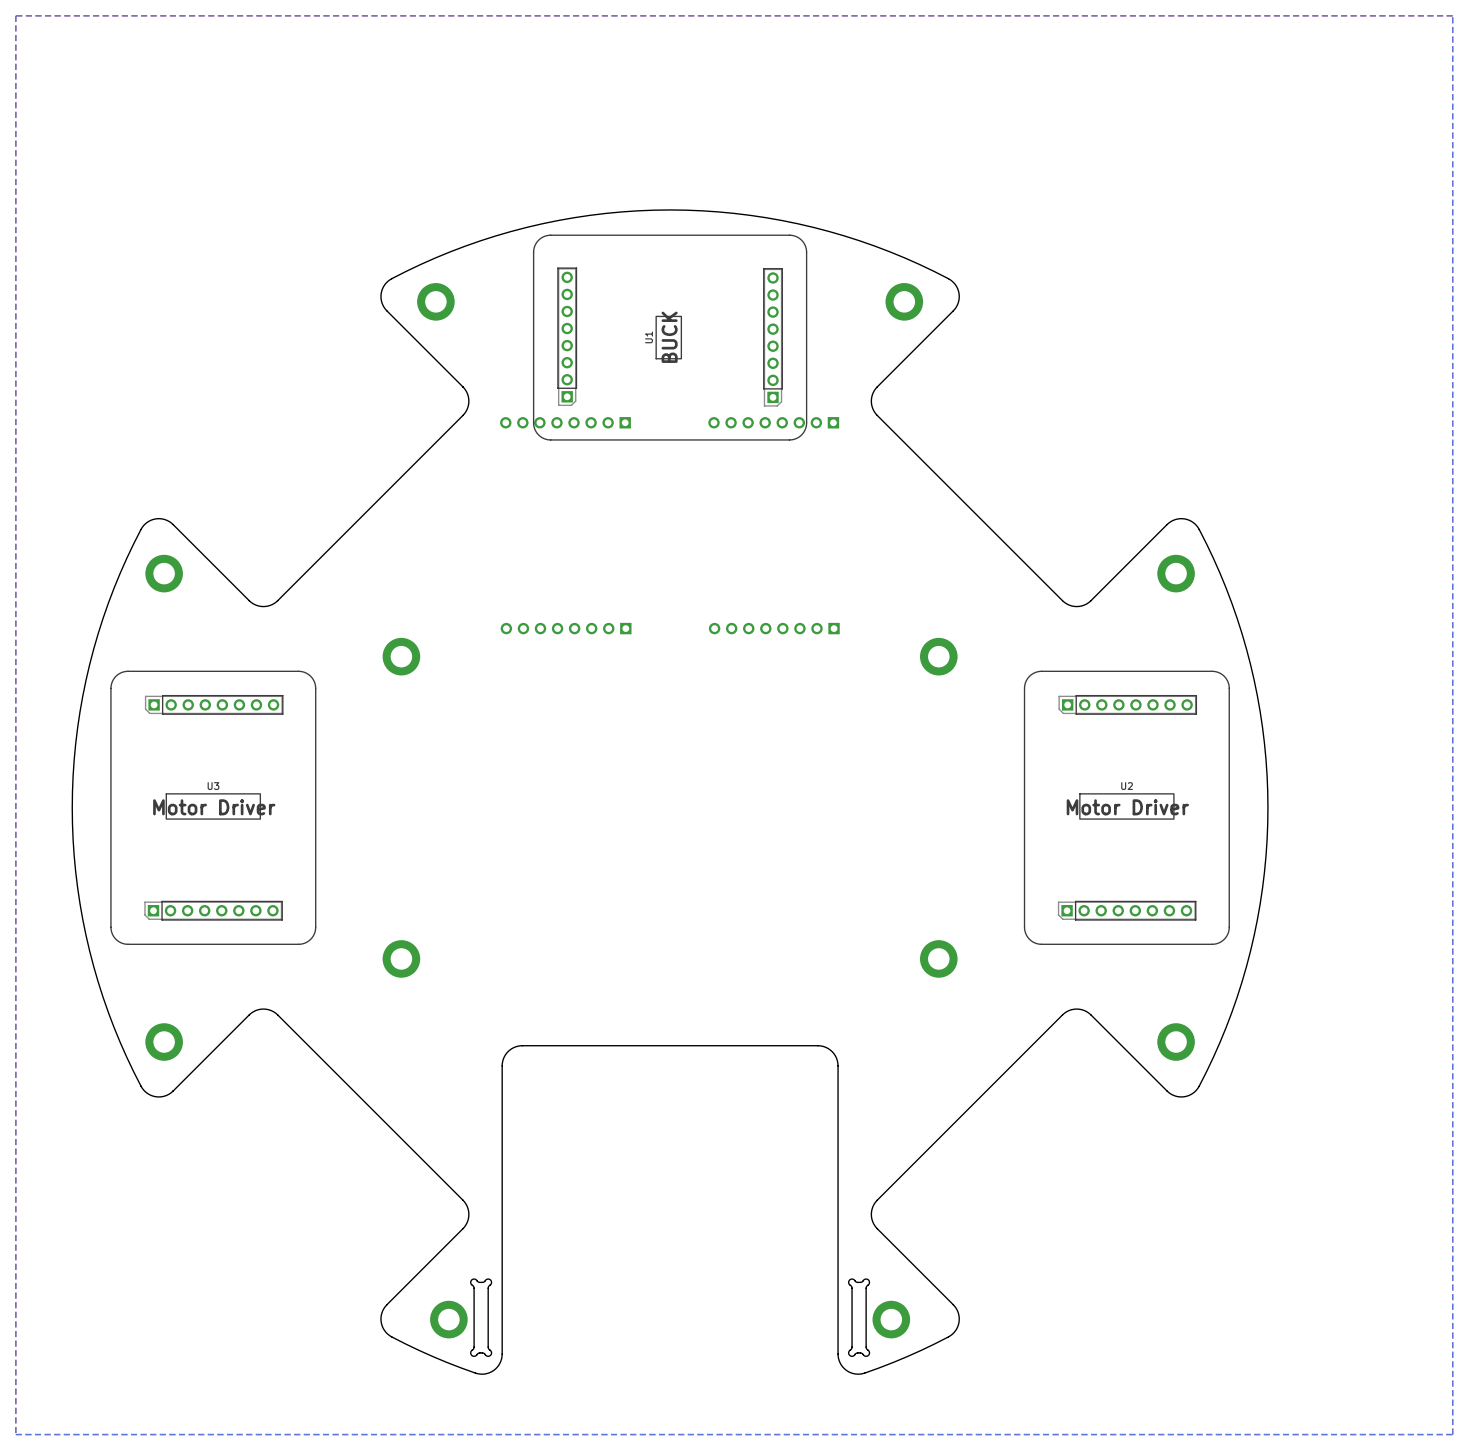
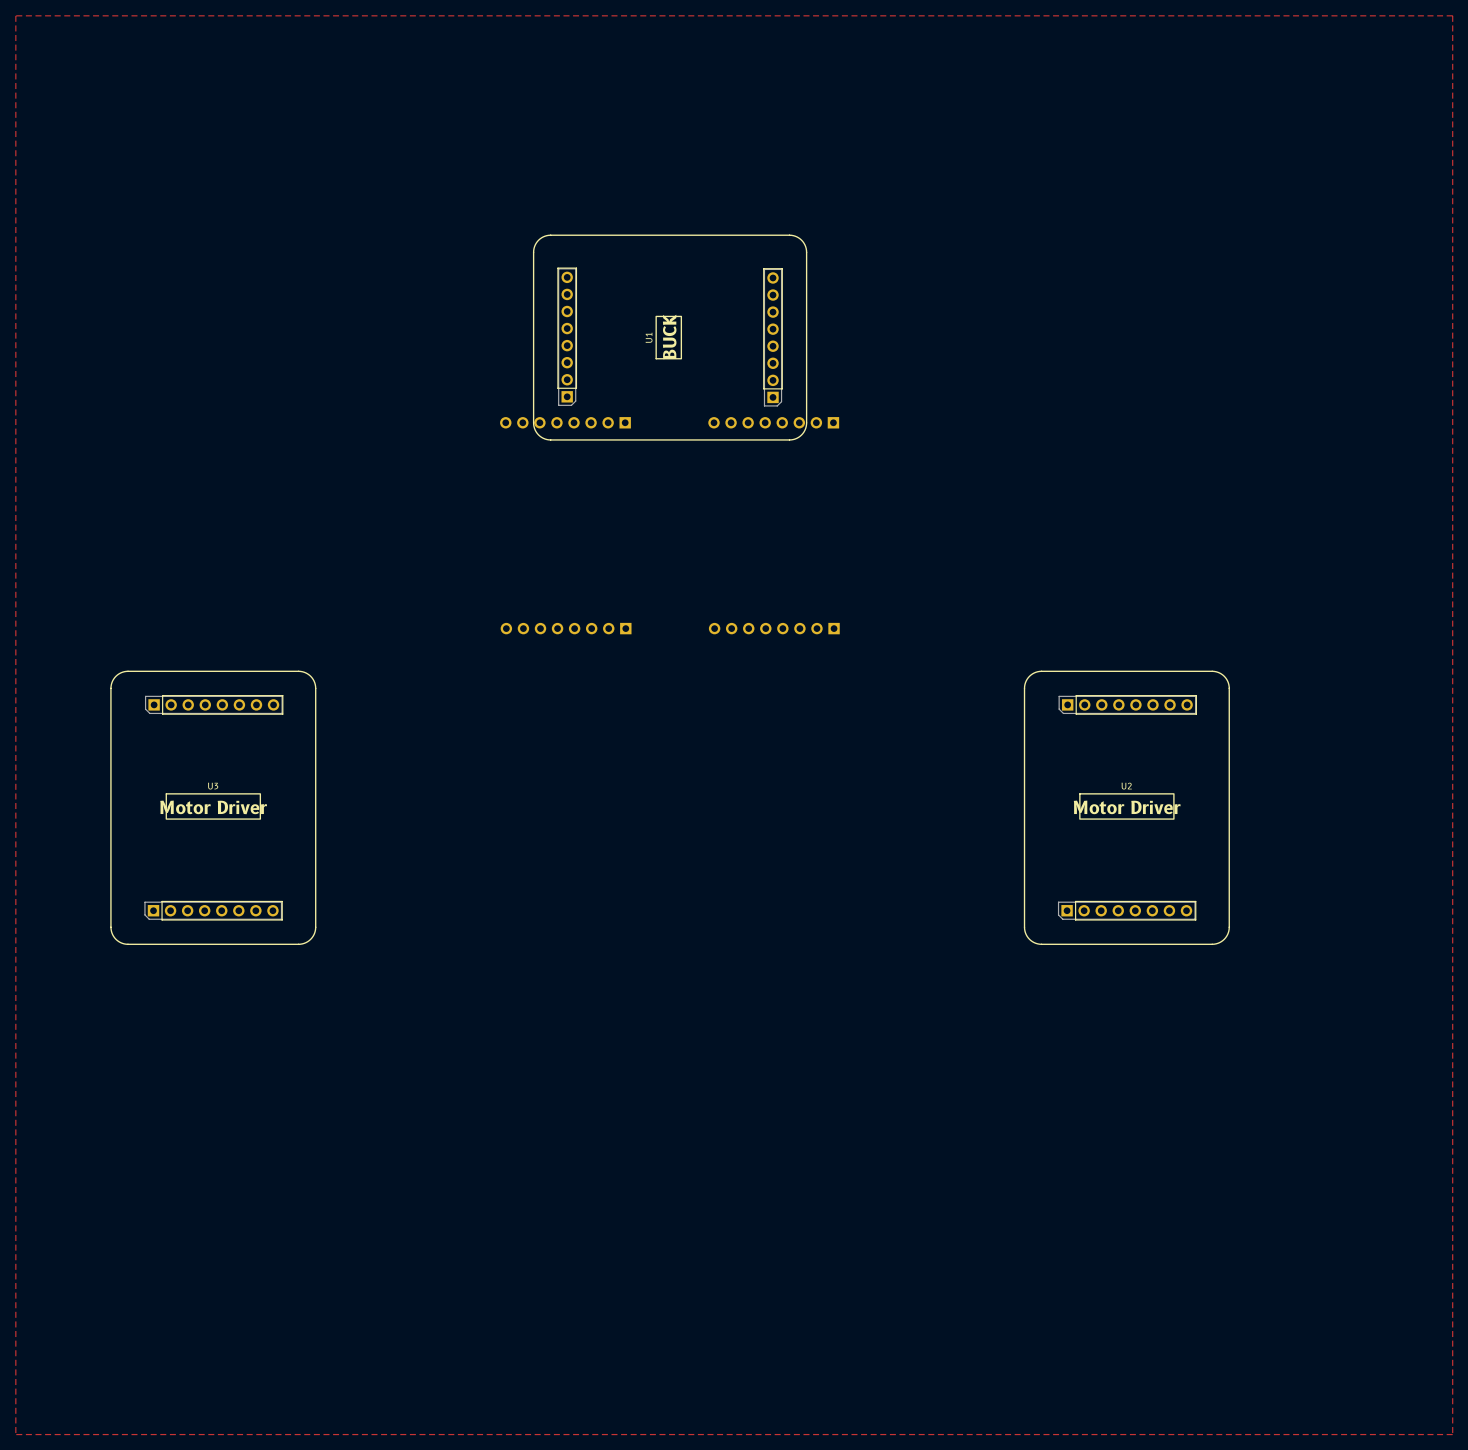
bottom zone outline: (1452, 15) (15, 15) (15, 1434) (1452, 1434) (1452, 15) -> none
board edge: (948, 278) (954, 283) (958, 291) (959, 298) (956, 307) (875, 388) (871, 401) (875, 413) (1069, 605) (1079, 606) (1089, 602) (1170, 521) (1179, 518) (1191, 521) (1199, 529) (1213, 558) (1241, 633) (1257, 695) (1266, 759) (1267, 823) (1264, 872) (1257, 919) (1241, 982) (1226, 1027) (1199, 1086) (1193, 1093) (1186, 1096) (1179, 1096) (1170, 1093) (1089, 1013) (1076, 1009) (1064, 1013) (874, 1204) (871, 1217) (875, 1226) (954, 1306) (958, 1315) (959, 1322) (955, 1330) (948, 1336) (893, 1362) (857, 1374) (844, 1368) (838, 1356) (838, 1065) (836, 1058) (832, 1051) (825, 1047) (817, 1045) (515, 1046) (506, 1053) (502, 1065) (500, 1361) (491, 1371) (477, 1373) (432, 1356) (391, 1336) (384, 1330) (381, 1324) (381, 1317) (383, 1308) (464, 1227) (468, 1214) (464, 1201) (271, 1010) (260, 1009) (251, 1013) (169, 1093) (158, 1096) (149, 1094) (141, 1086) (126, 1057) (98, 982) (82, 919) (74, 856) (72, 807) (75, 743) (82, 695) (98, 633) (114, 587) (141, 529) (145, 523) (153, 519) (160, 518) (169, 521) (250, 602) (263, 606) (276, 602) (462, 415) (467, 407) (468, 398) (464, 388) (383, 307) (380, 295) (383, 286) (391, 278) (420, 264) (495, 235) (558, 220) (605, 213) (670, 209) (734, 213) (797, 223) (844, 235) (890, 251) (948, 278) -> none
part: (435, 301) -> none
part: (904, 301) -> none
part: (164, 573) -> none
part: (1176, 573) -> none
part: (401, 656) -> none
part: (938, 656) -> none
part: (401, 958) -> none
part: (938, 958) -> none
part: (164, 1042) -> none
part: (1176, 1042) -> none
board edge: (485, 1280) (479, 1282) (473, 1279) (470, 1281) (474, 1288) (474, 1347) (470, 1352) (473, 1356) (479, 1352) (487, 1356) (491, 1353) (488, 1347) (488, 1288) (491, 1282) (488, 1279) (485, 1280) -> none
board edge: (863, 1280) (857, 1282) (851, 1279) (848, 1281) (852, 1288) (852, 1347) (848, 1353) (851, 1356) (857, 1352) (865, 1356) (869, 1353) (866, 1347) (866, 1288) (869, 1282) (866, 1279) (863, 1280) -> none
part: (448, 1319) -> none
part: (891, 1319) -> none

